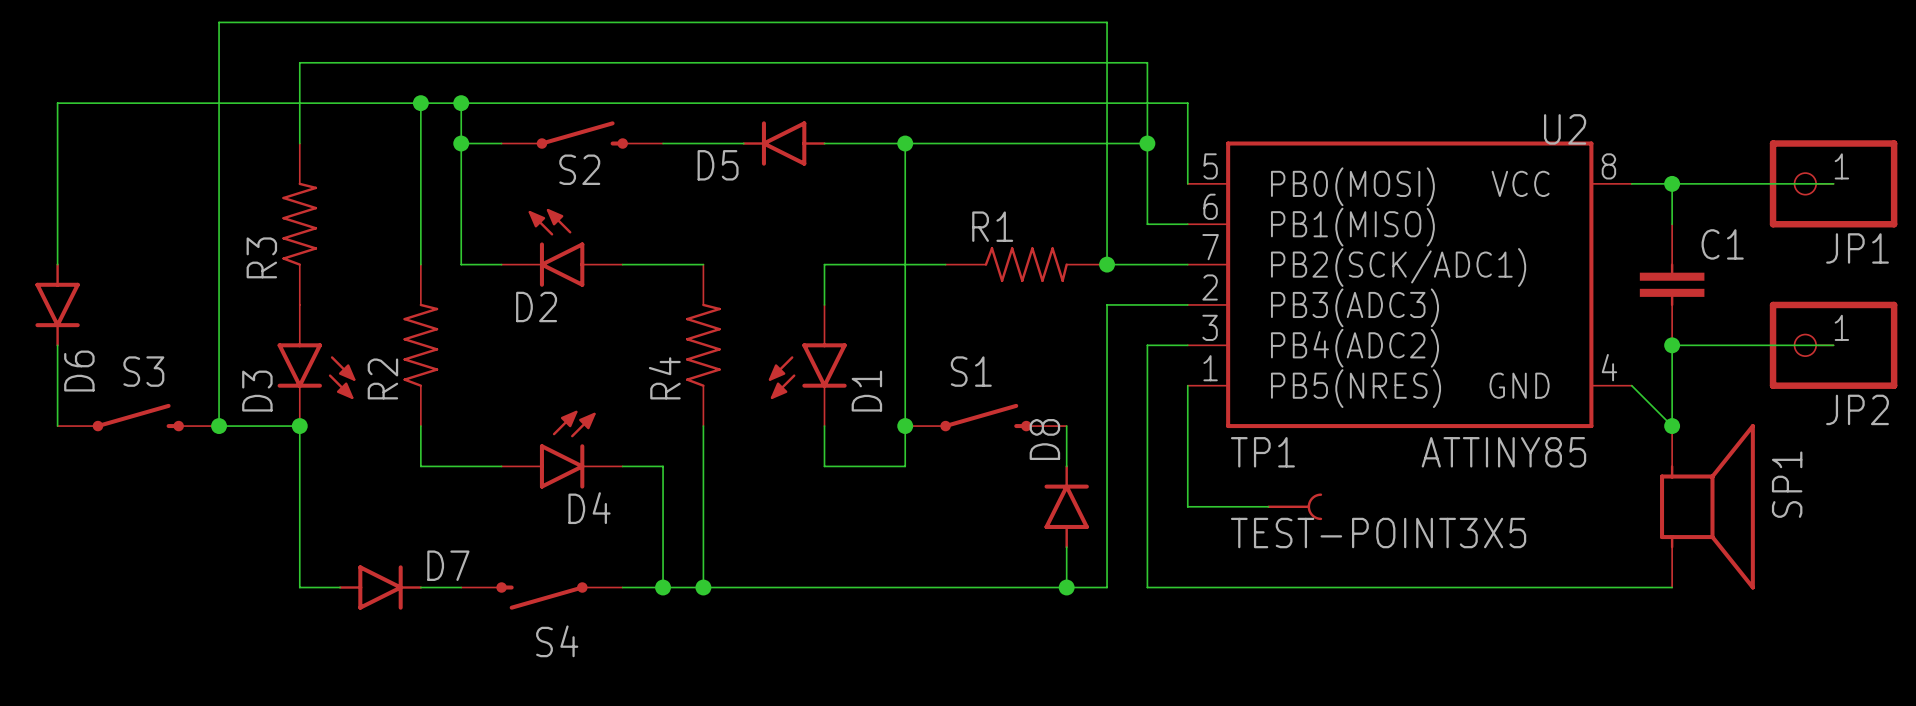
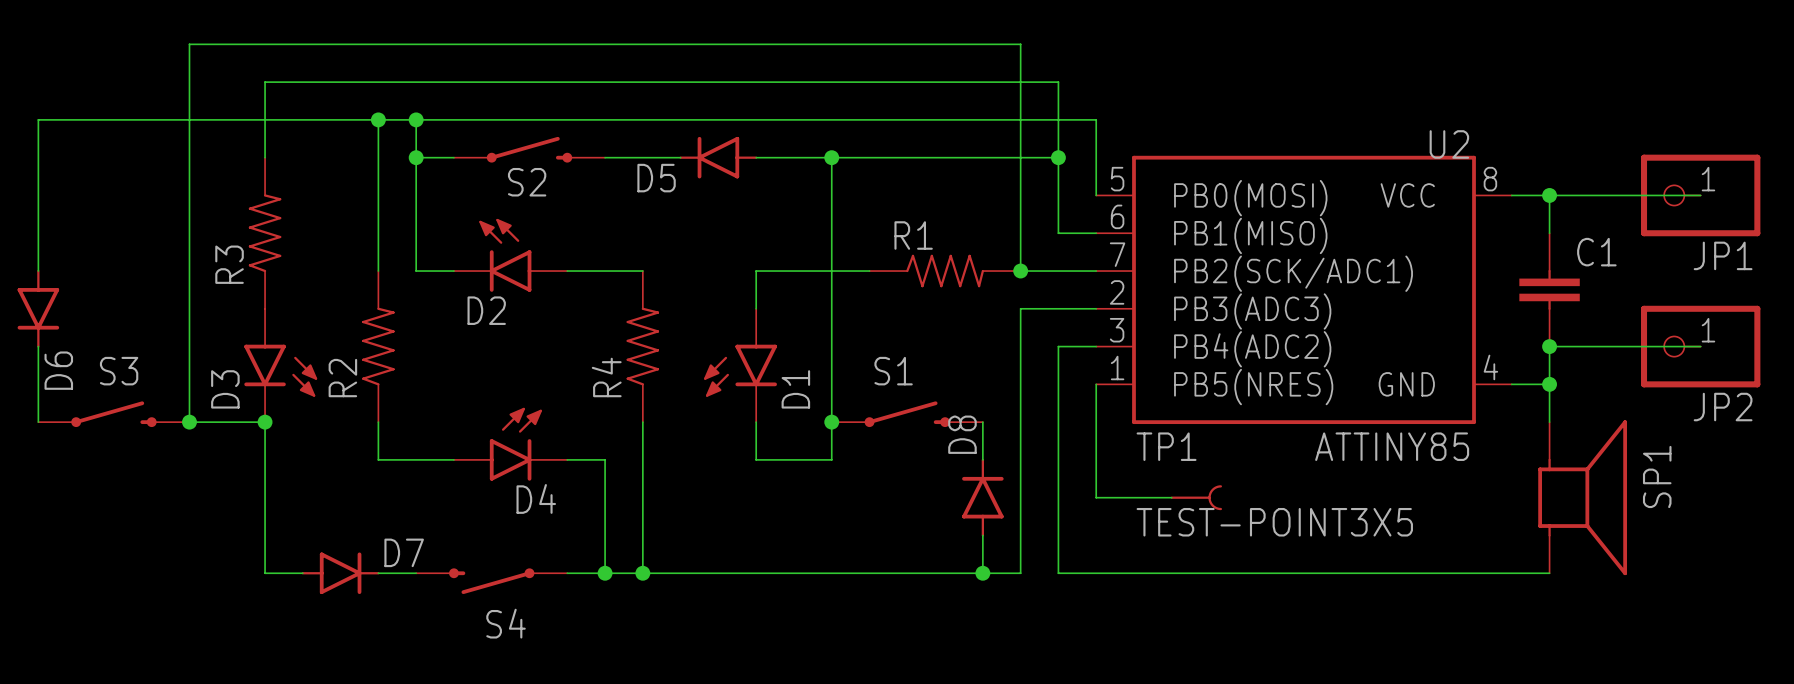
wire: (1631, 385) (1672, 426) -> (1511, 384) (1549, 384)
junction position: (1672, 426) -> (1549, 384)

